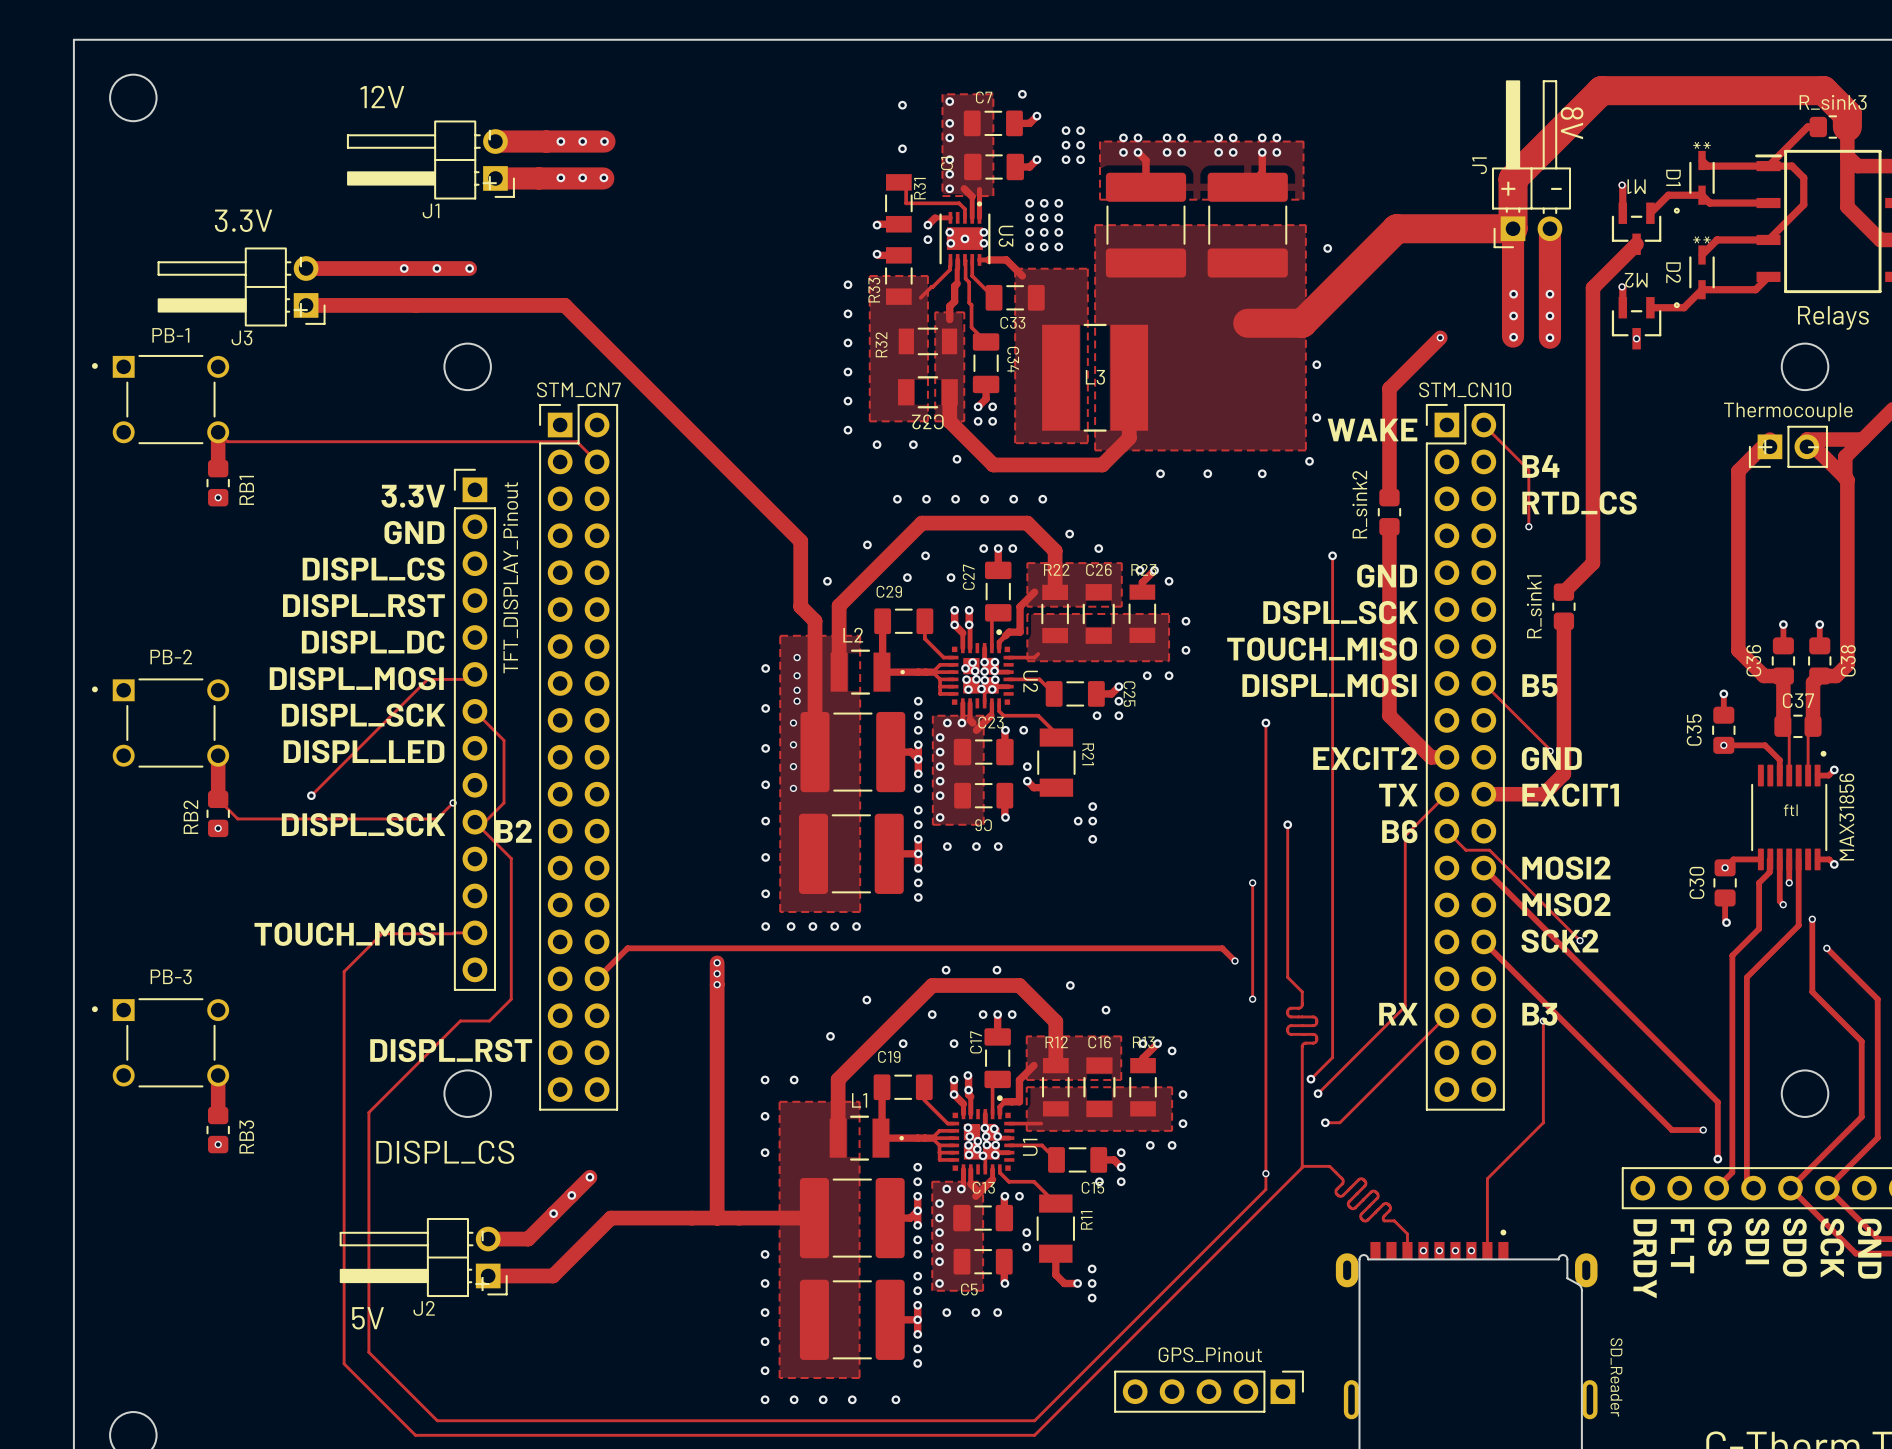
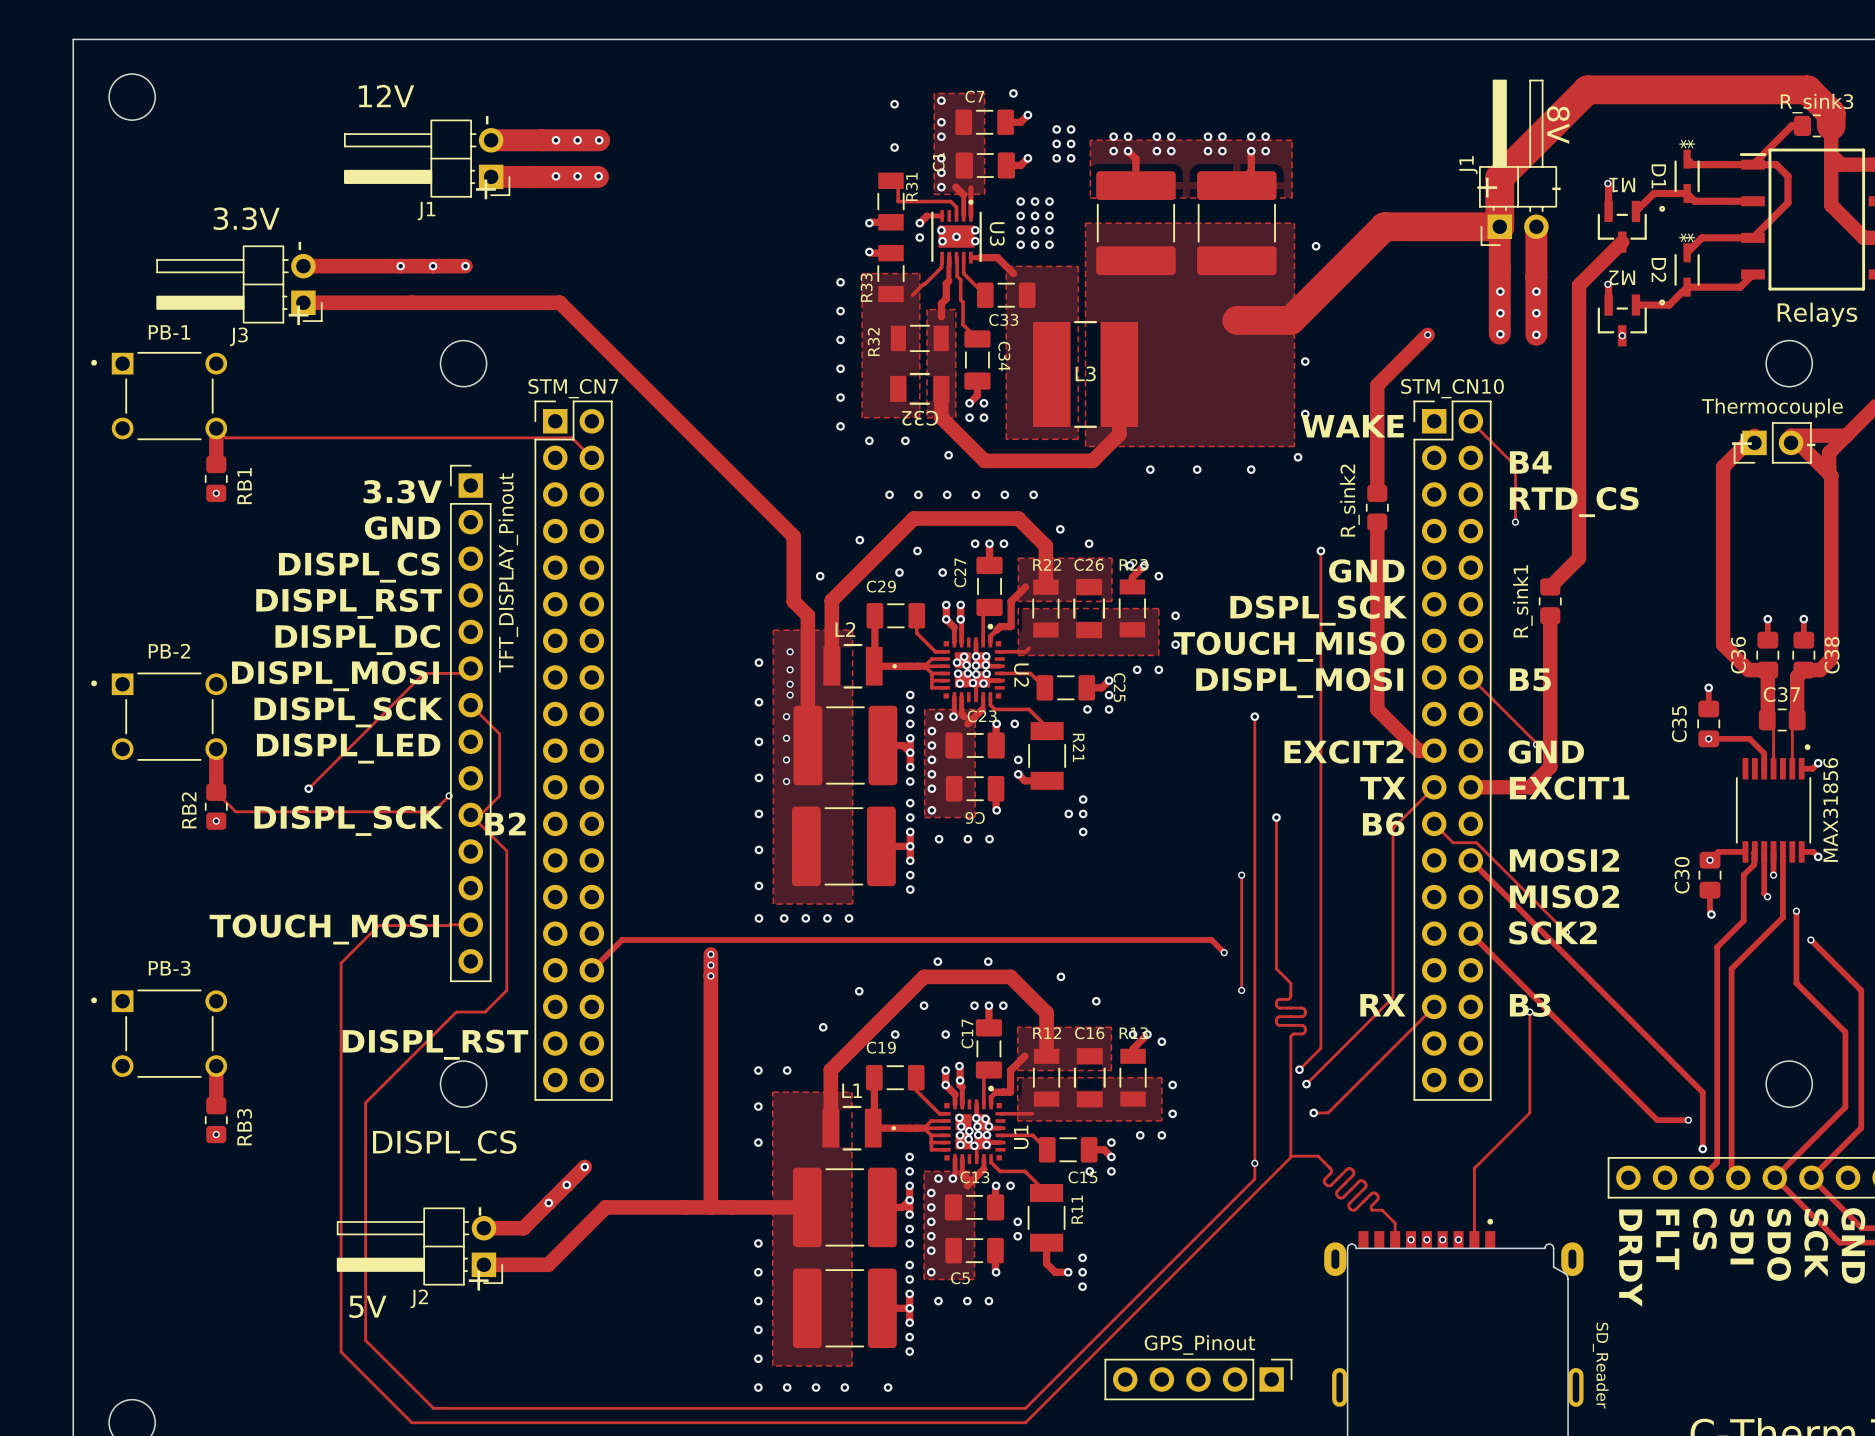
text: ftl (1790, 810) -> none

